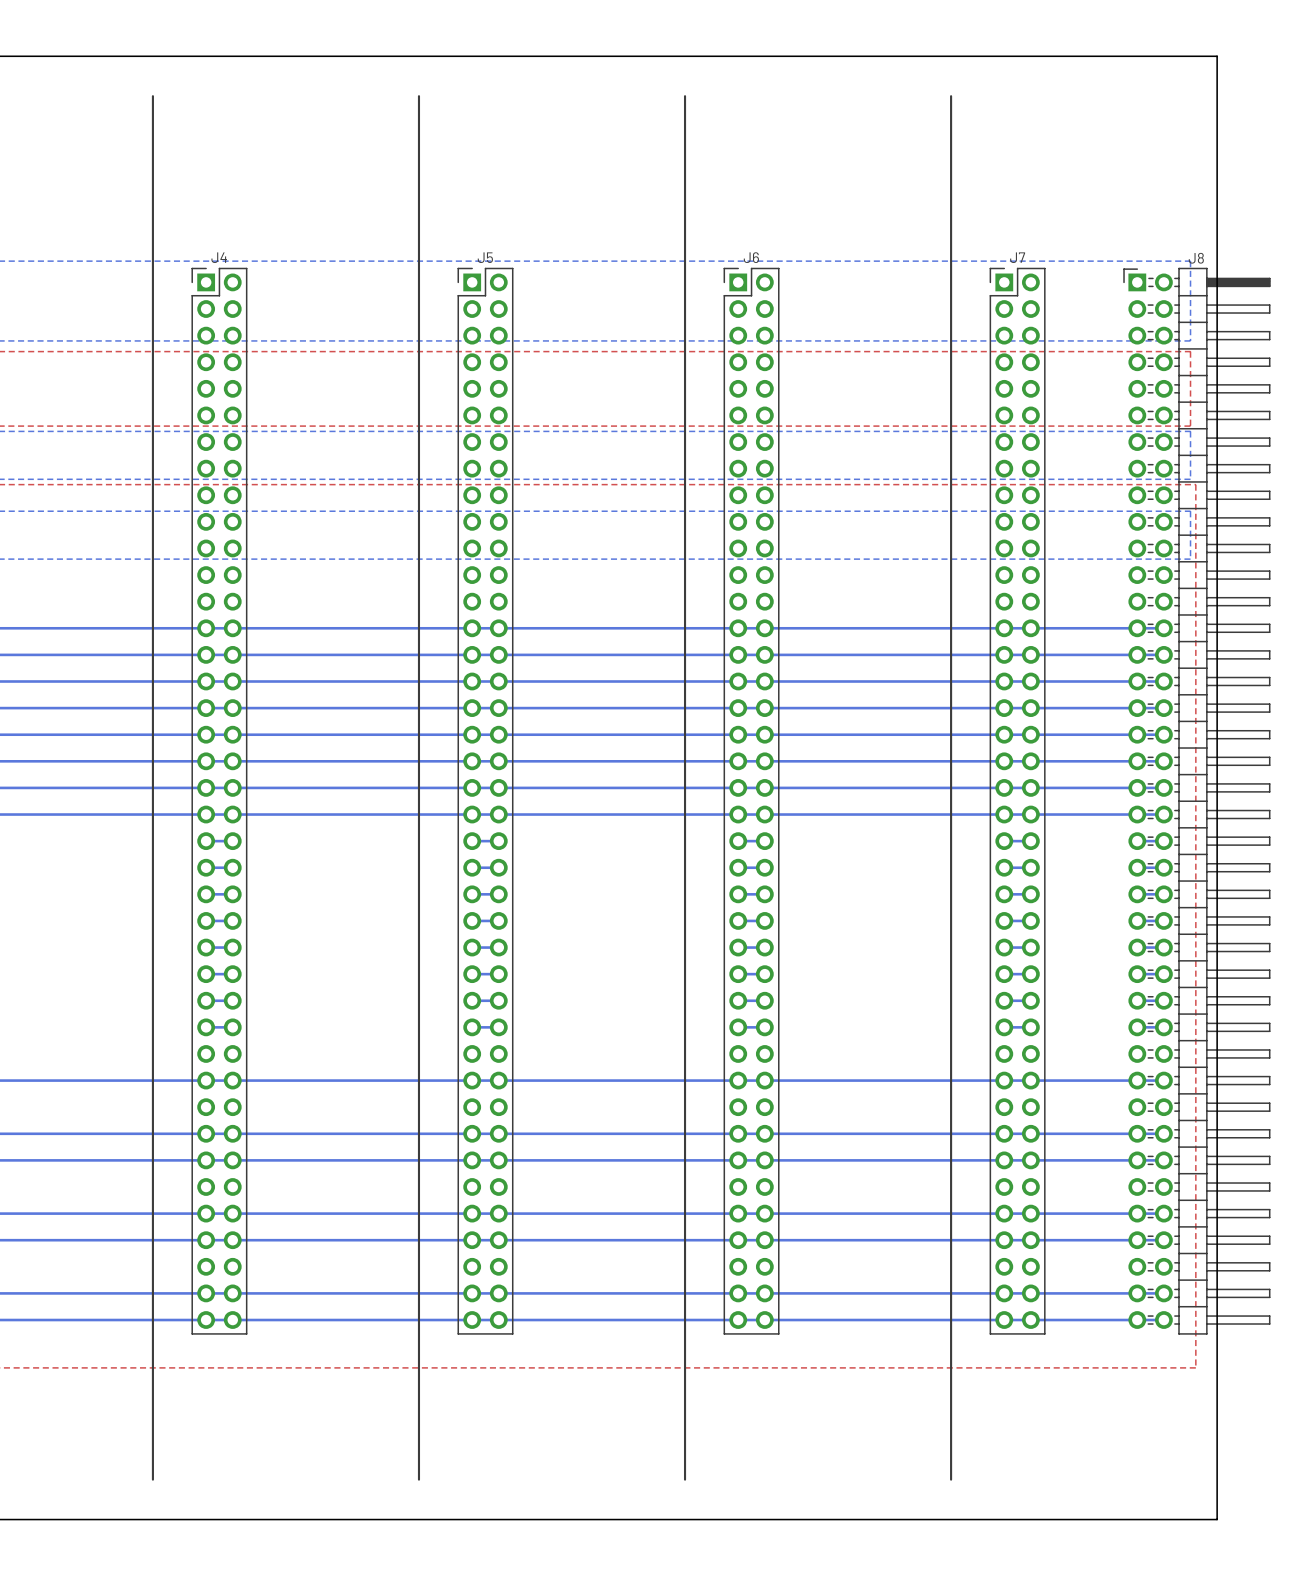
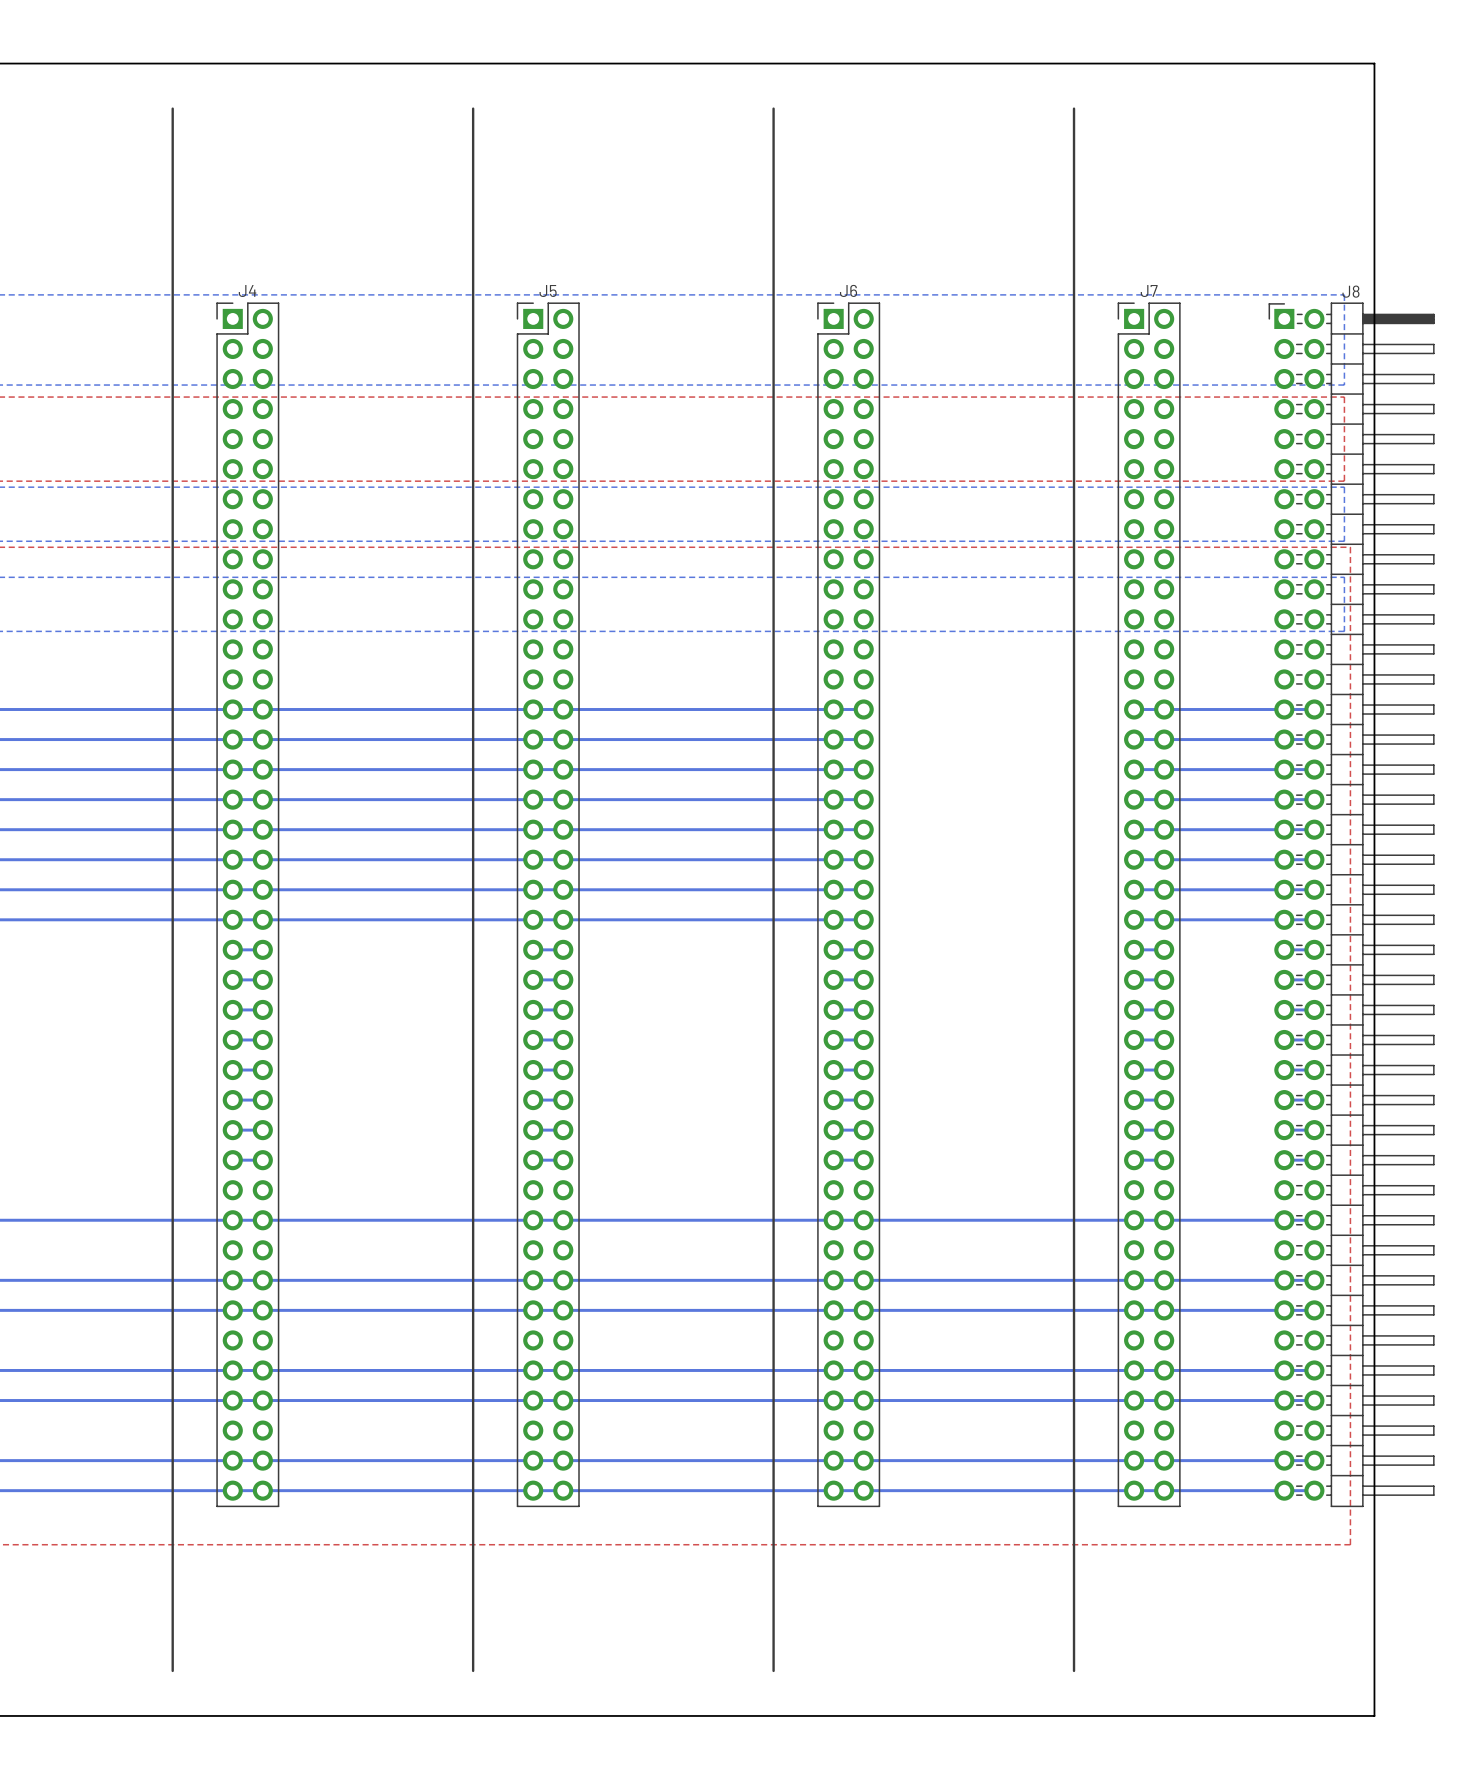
bottom track: (764, 628) (1004, 628) -> none
bottom track: (764, 654) (1004, 654) -> none
bottom track: (764, 681) (1004, 681) -> none
bottom track: (764, 708) (1004, 708) -> none
bottom track: (764, 734) (1004, 734) -> none
bottom track: (764, 761) (1004, 761) -> none
bottom track: (764, 787) (1004, 787) -> none
bottom track: (764, 814) (1004, 814) -> none

